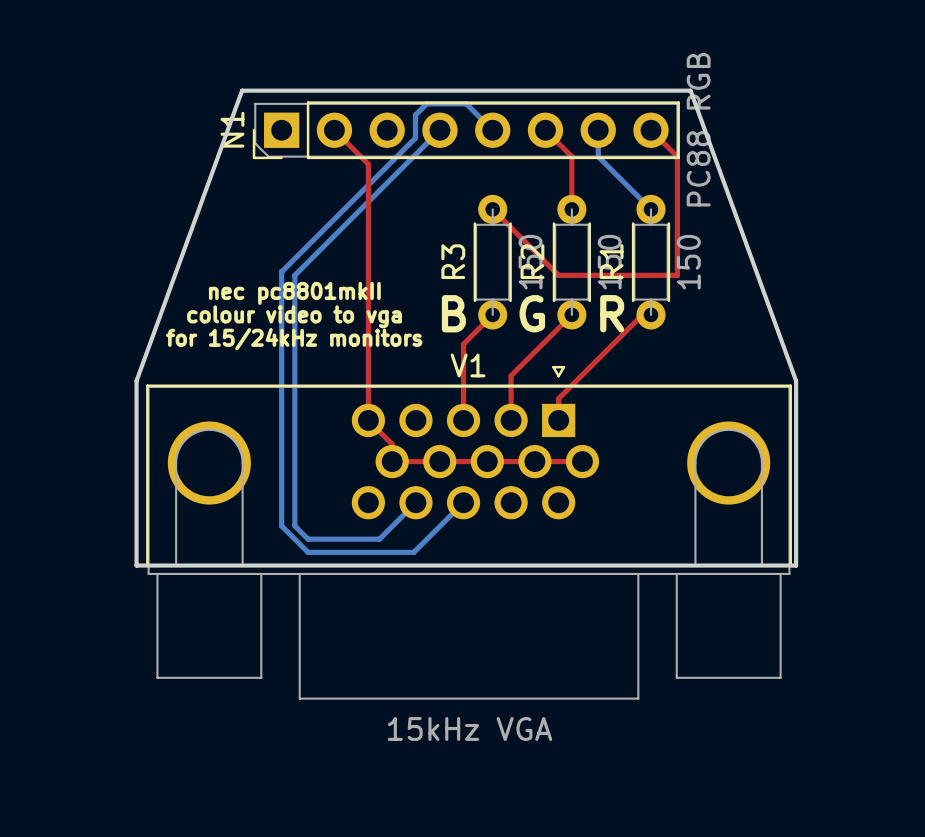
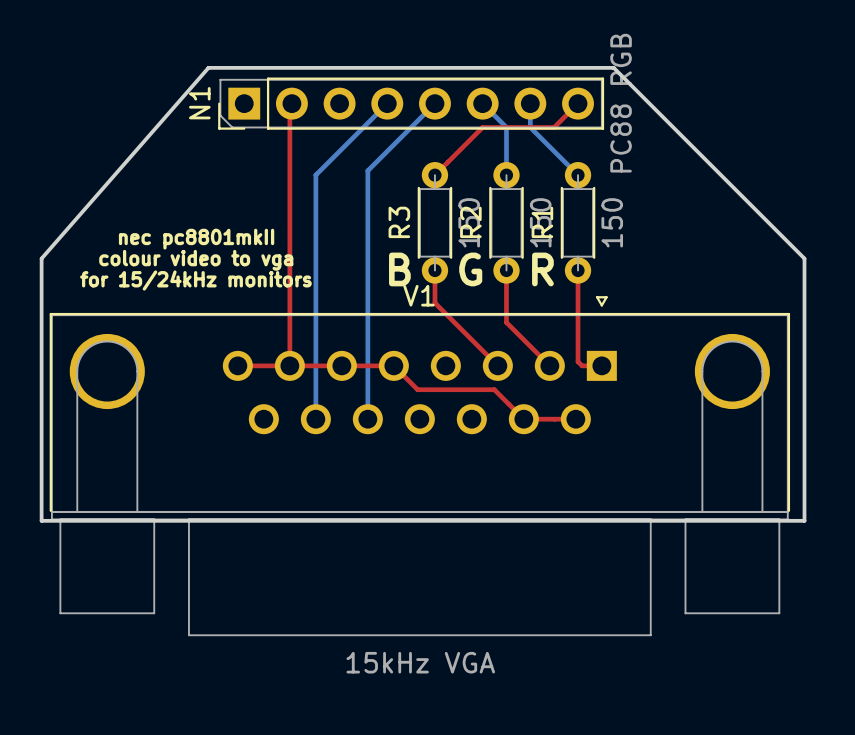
board edge: (242, 90) (136, 380) (136, 565) (796, 565) (796, 380) (690, 90) -> (208, 67) (41, 258) (41, 520) (804, 520) (804, 258) (613, 67)
top track: (334, 130) (368, 164) (368, 420) (392, 444) (392, 461) (582, 461) -> none
bottom track: (492, 130) (466, 103) (426, 103) (415, 115) (415, 138) (281, 271) (281, 525) (308, 552) (413, 552) (463, 502) -> (434, 103) (367, 170) (367, 419)
top track: (545, 130) (571, 156) (571, 209) -> none
bottom track: none -> (482, 103) (506, 127) (506, 175)
top track: (651, 130) (677, 156) (677, 275) (558, 275) (492, 209) -> (578, 103) (554, 127) (482, 127) (434, 175)
top track: none -> (289, 105) (289, 365)
bottom track: (360, 209) (294, 275) (294, 525) (308, 539) (379, 539) (415, 502) -> (315, 175) (315, 419)
text position: nec pc8801mkII (294, 293) -> nec pc8801mkII (196, 239)
top track: (492, 314) (463, 344) (463, 420) -> (434, 270) (434, 302) (497, 365)
top track: (571, 314) (511, 375) (511, 420) -> (506, 270) (506, 322) (549, 365)
top track: (651, 314) (642, 314) (558, 398) (558, 420) -> (578, 270) (578, 361) (582, 365) (601, 365)
text position: colour video to vga (294, 316) -> colour video to vga (196, 260)
text position: for 15/24kHz monitors (294, 339) -> for 15/24kHz monitors (195, 280)
V1 footprint: [146, 365, 792, 700] -> [49, 296, 791, 637]
top track: none -> (237, 365) (393, 365) (417, 389) (494, 389) (523, 419) (575, 419)

